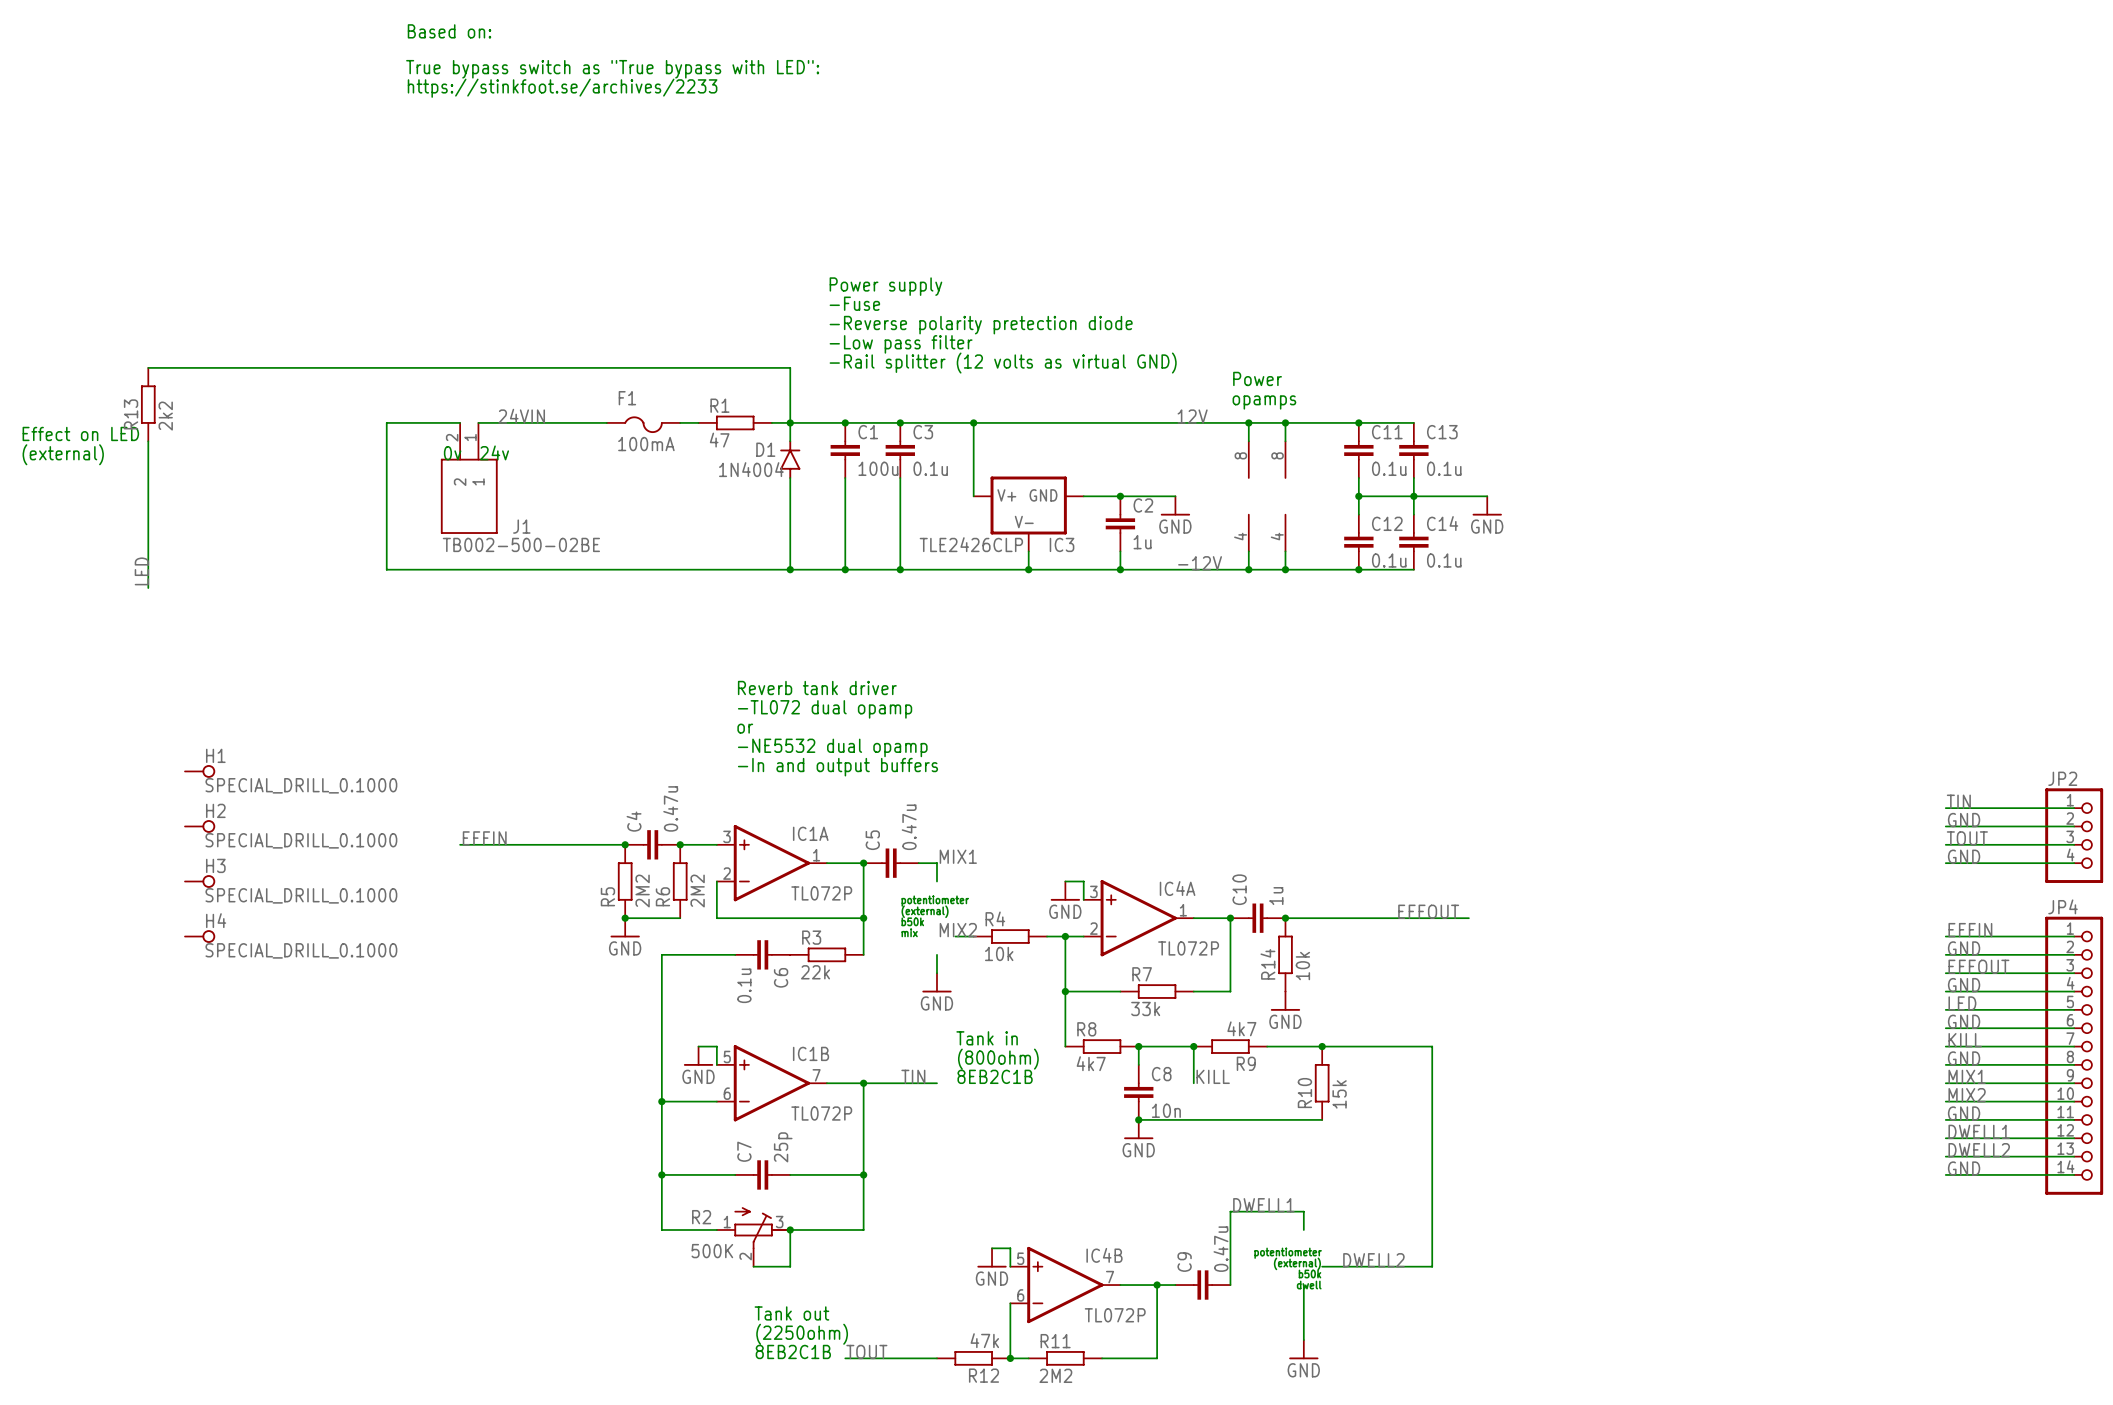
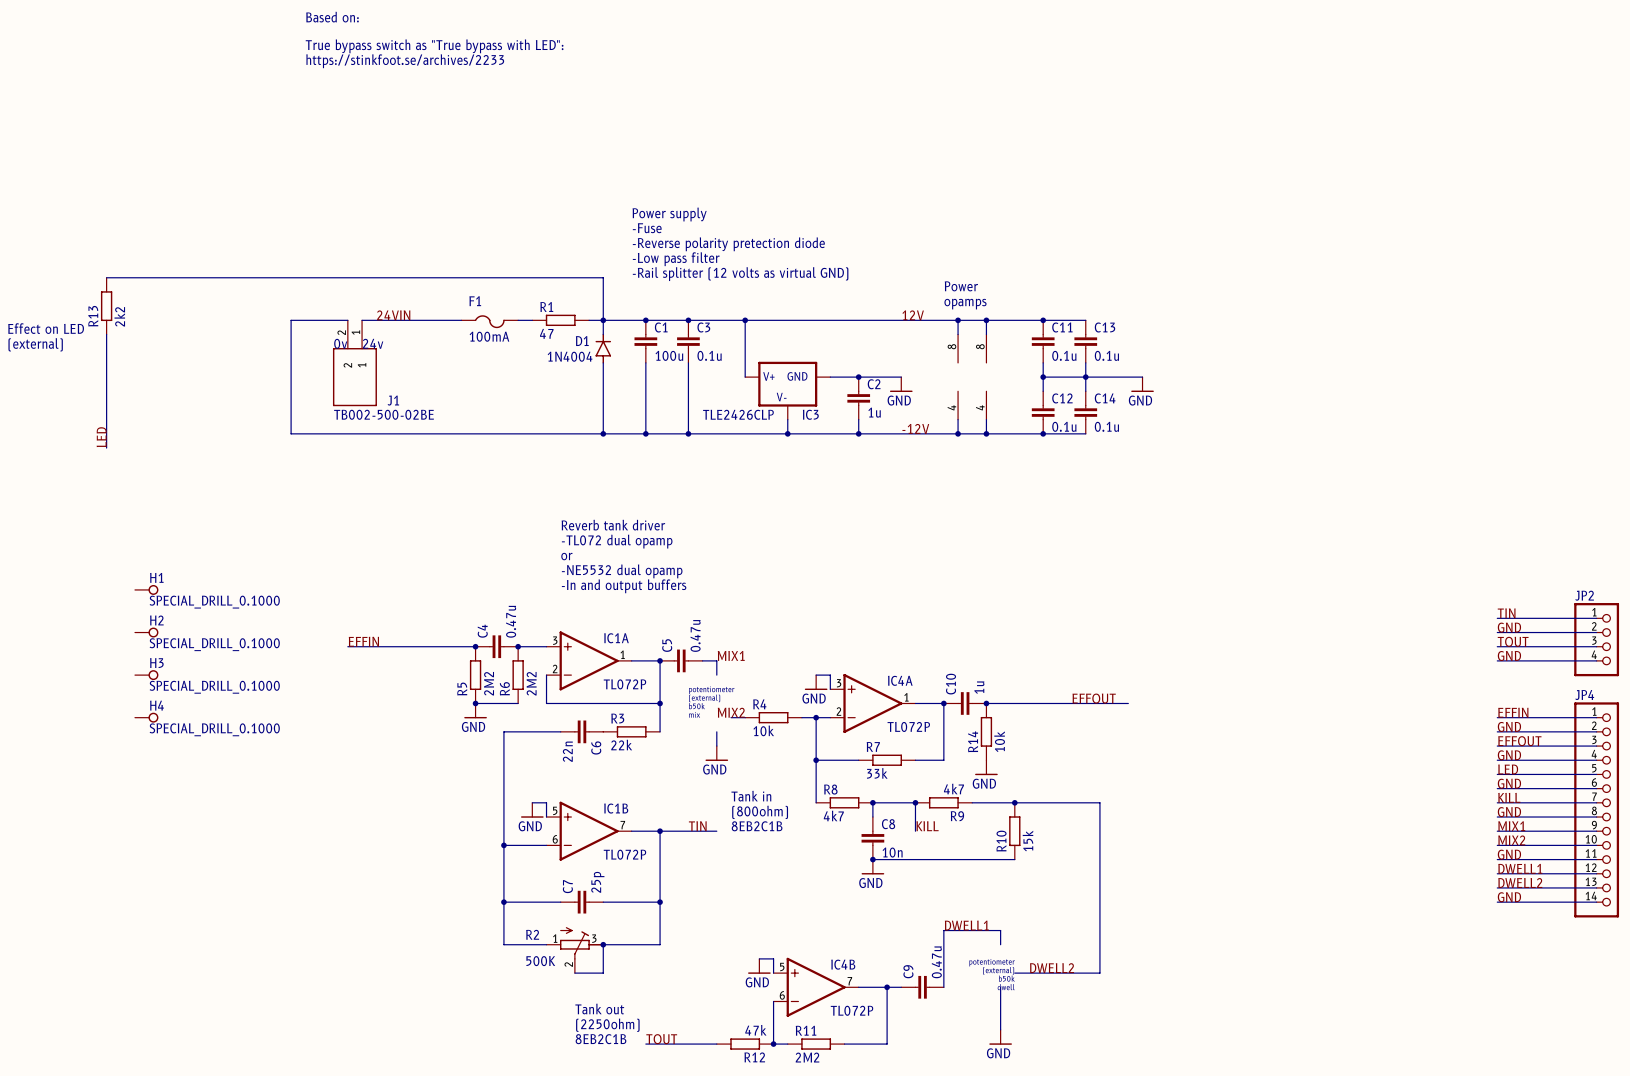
C6 value: 0.1u (744, 985) -> 22n (567, 751)

